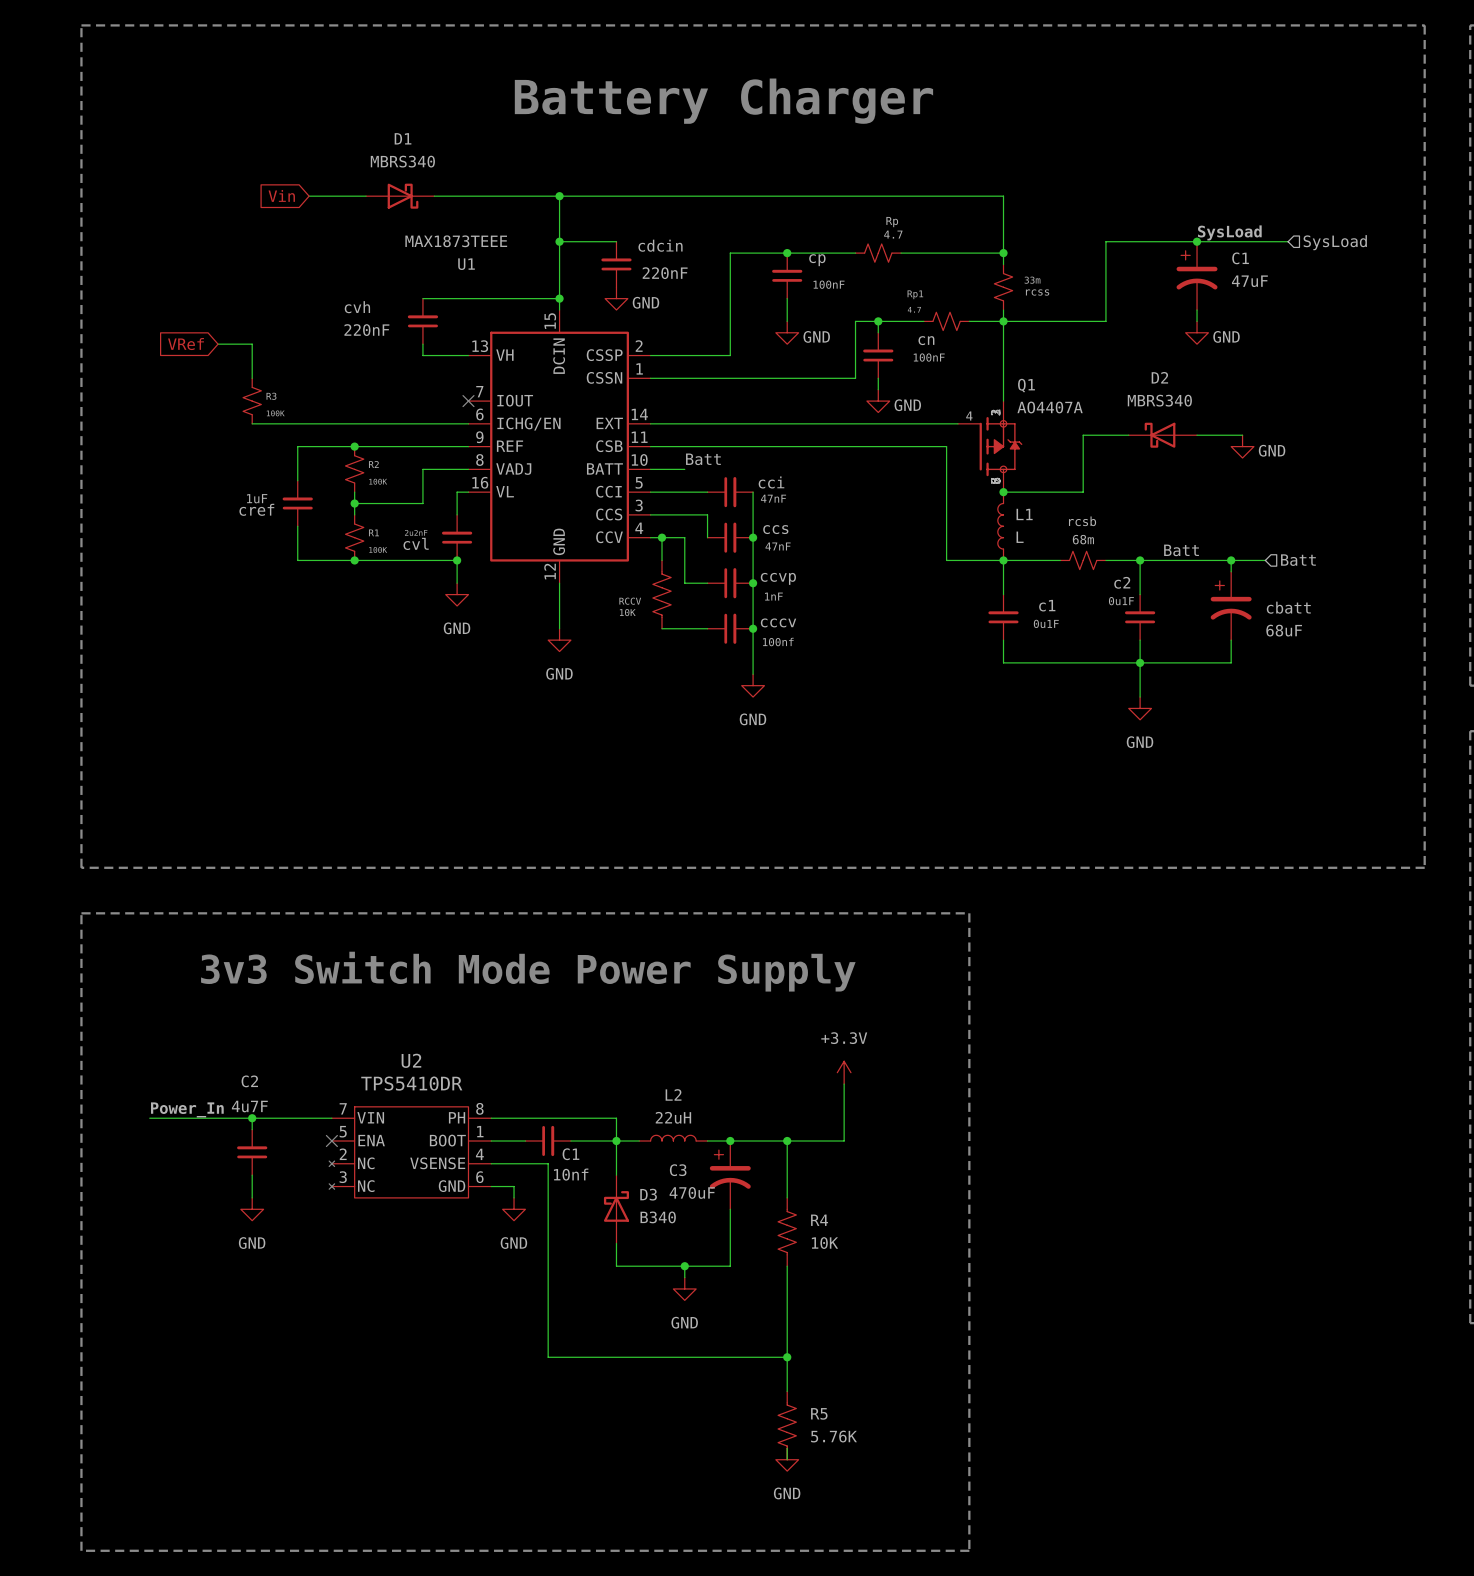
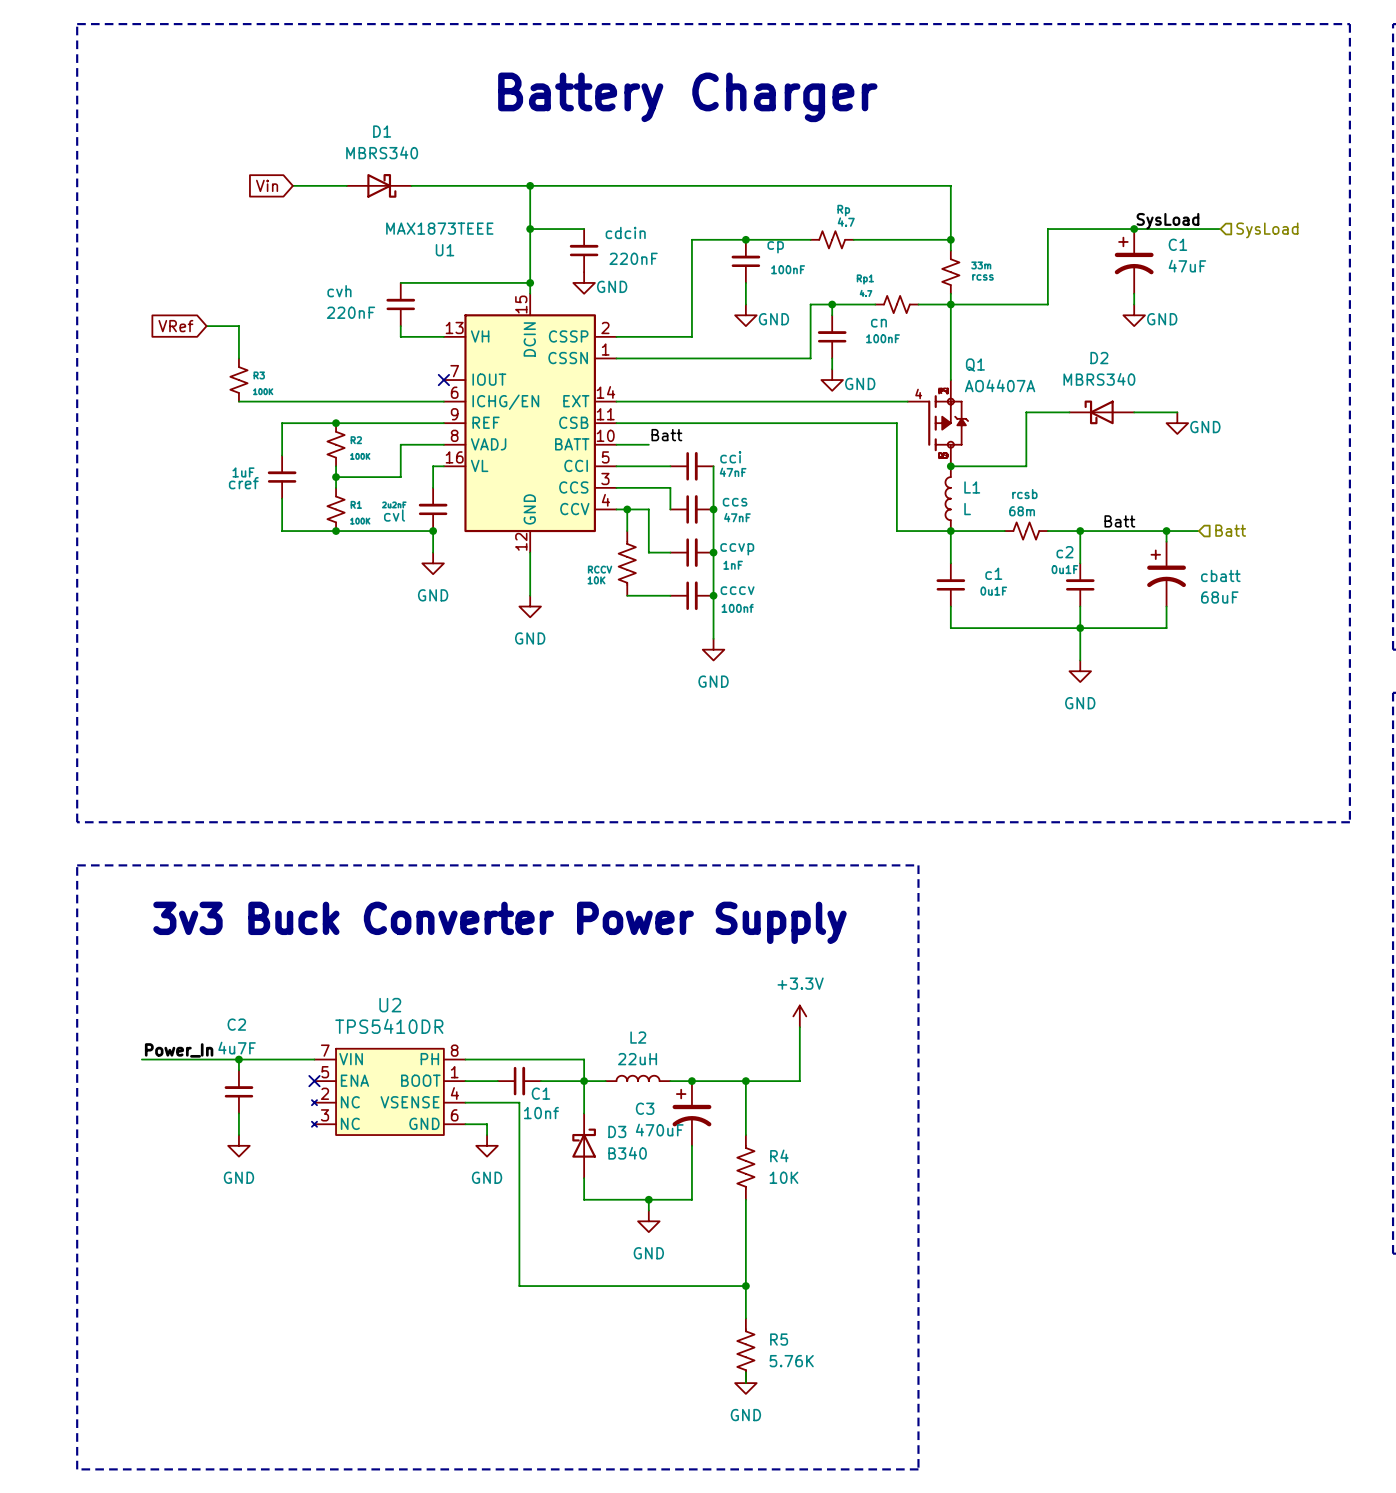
text: 3v3 Switch Mode Power Supply (528, 971) -> 3v3 Buck Converter Power Supply (499, 922)

